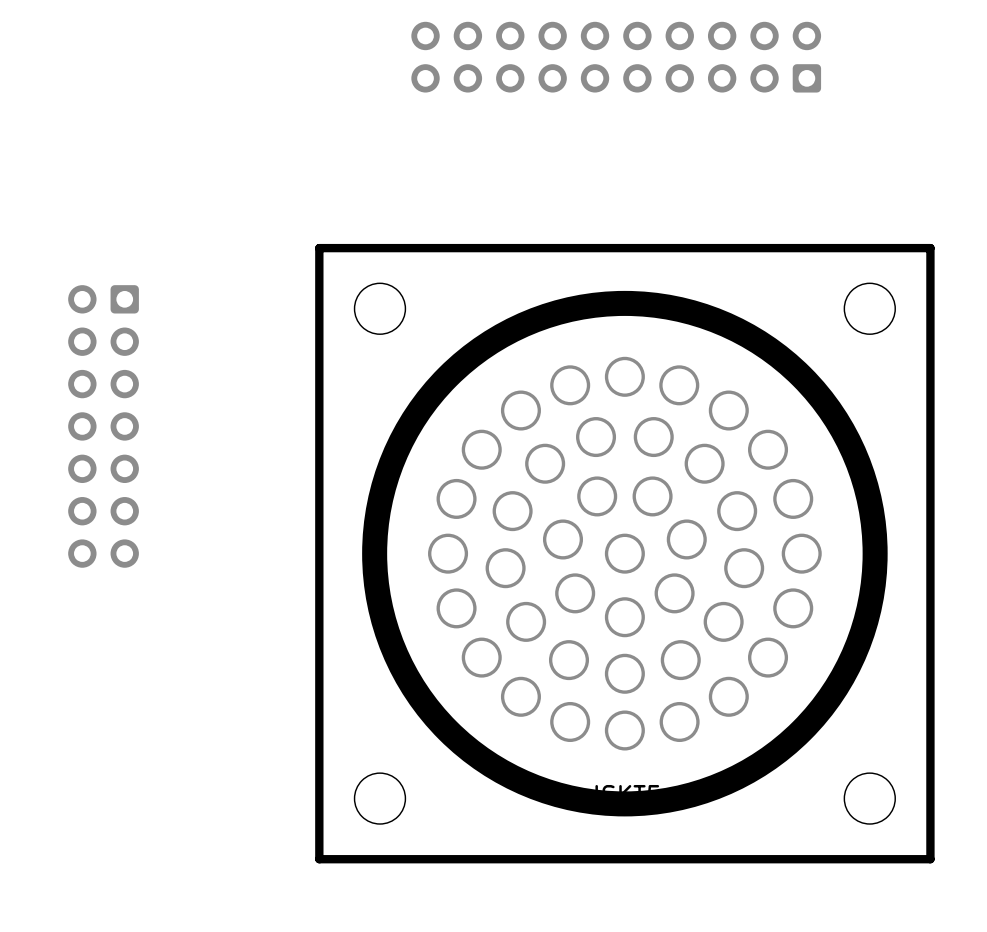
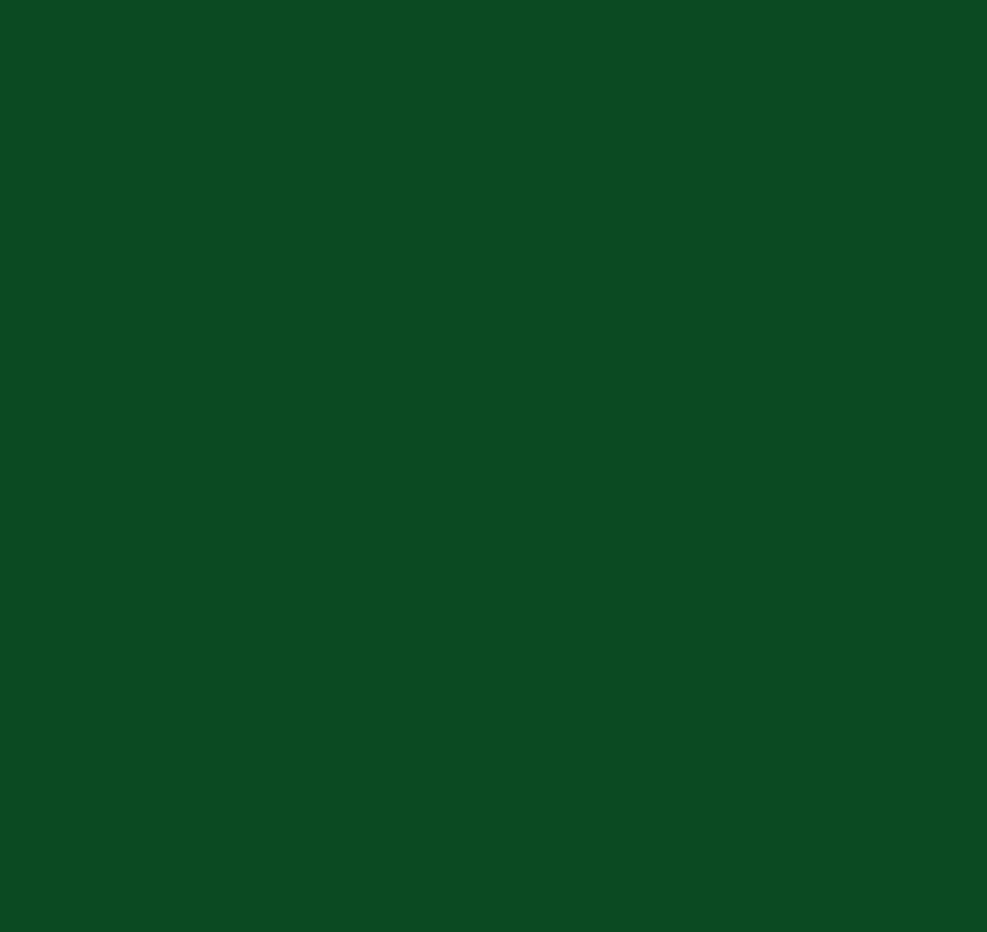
part: (616, 57) -> none
part: (103, 426) -> none
part: (624, 553) -> none

